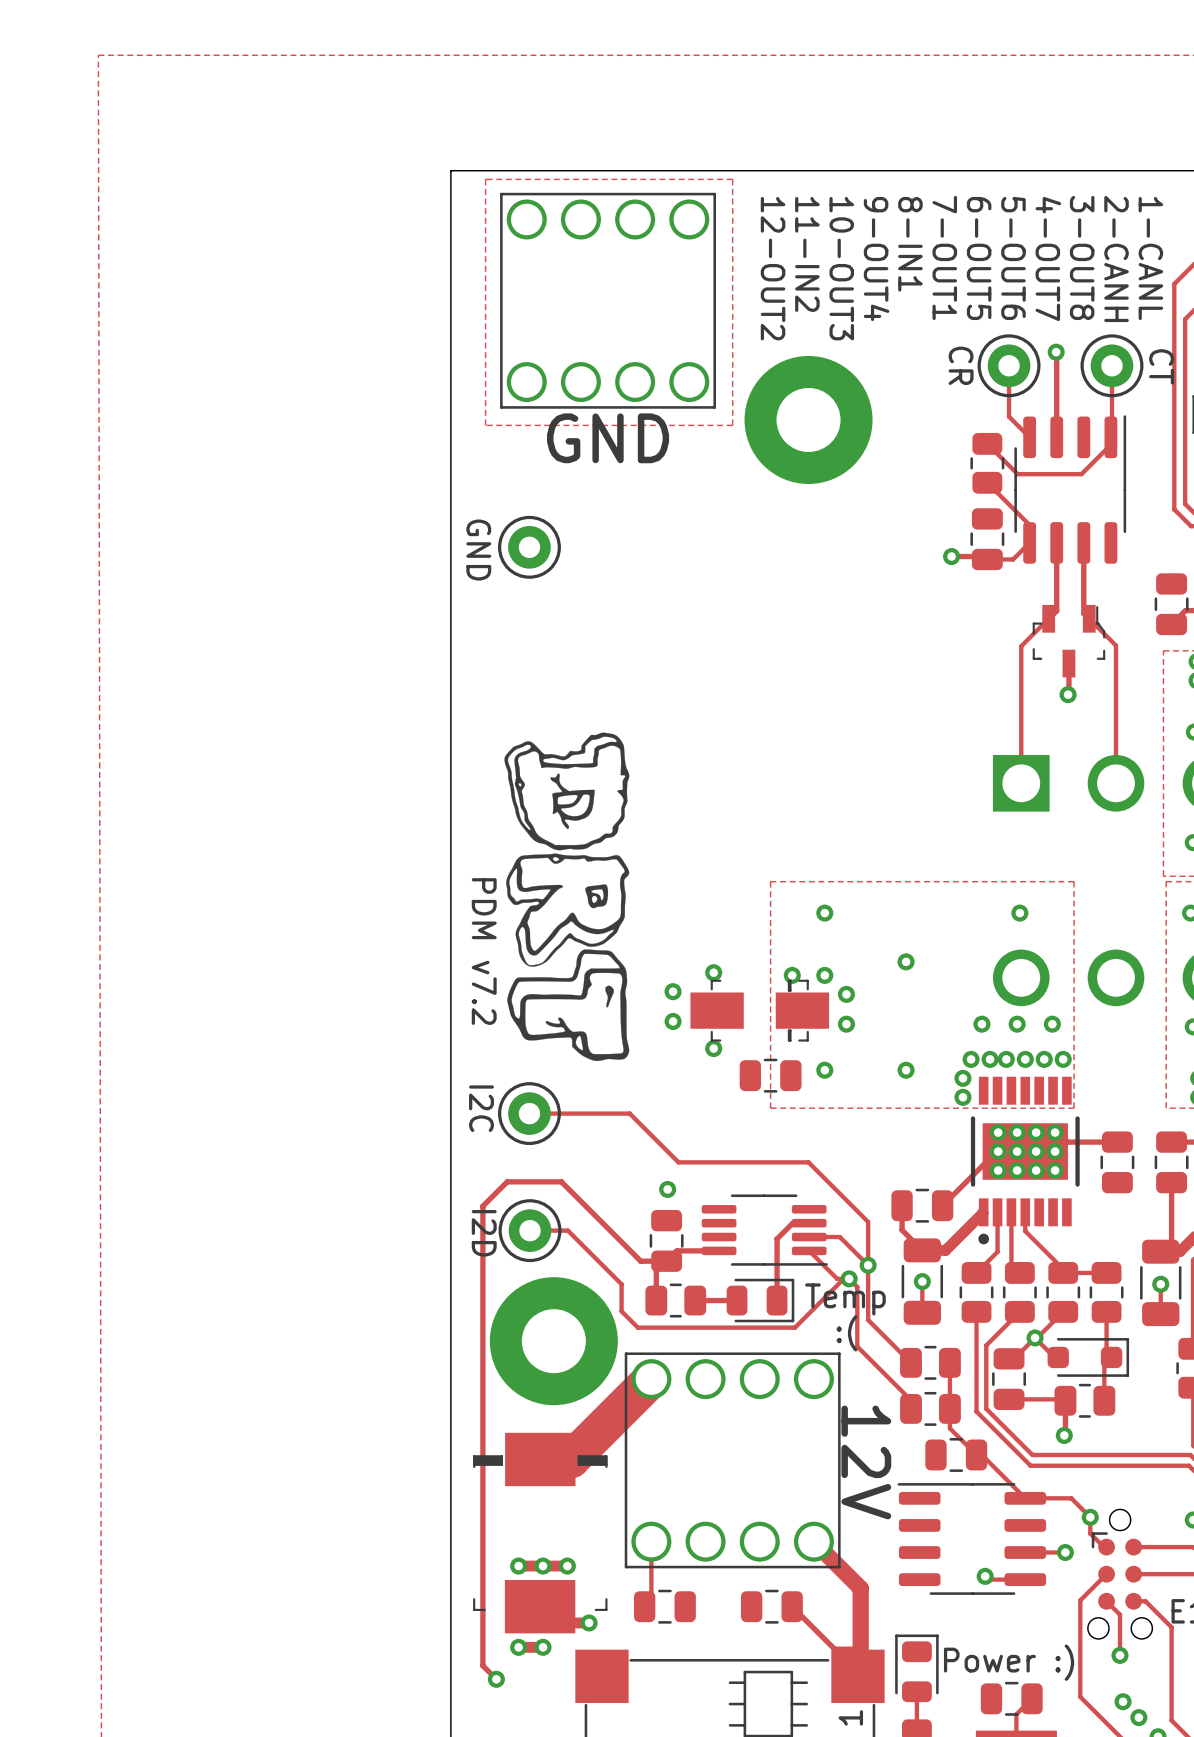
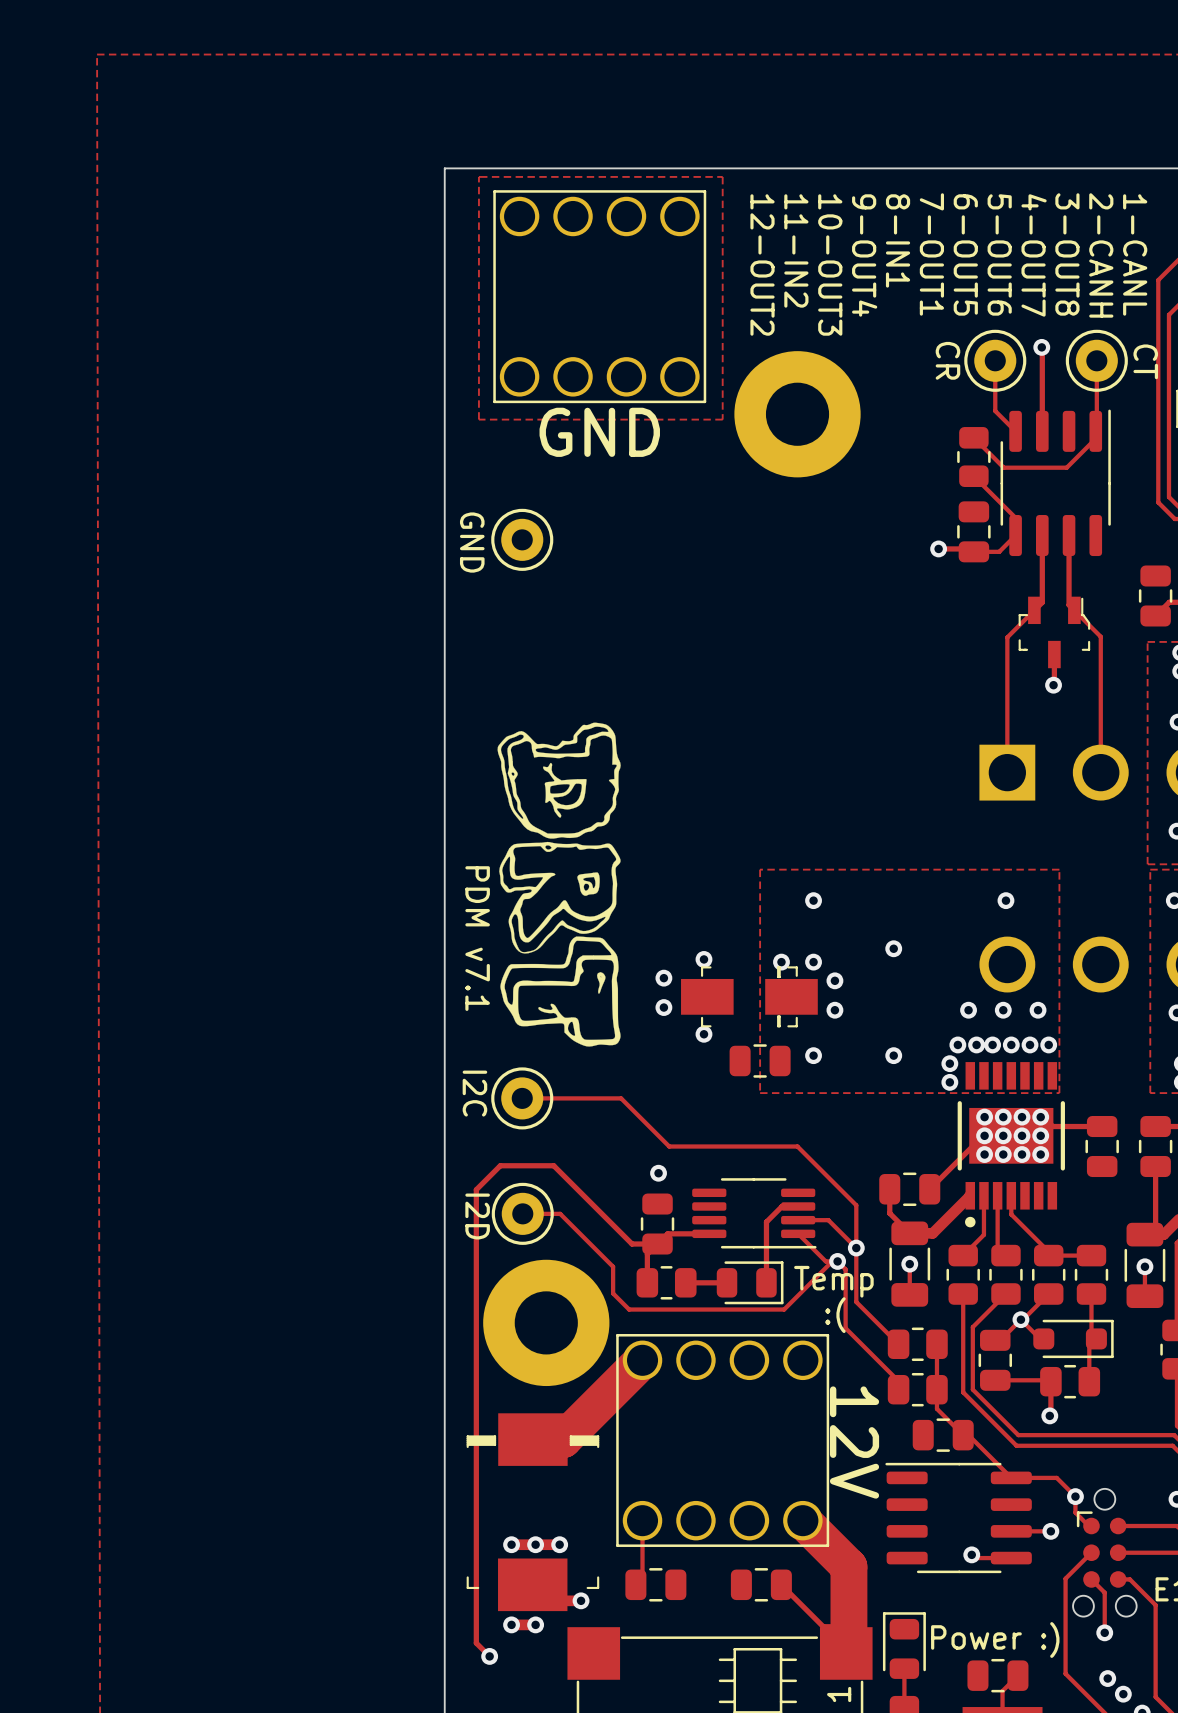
text: PDM v7.2 (484, 951) -> PDM v7.1 (477, 938)
track width: thin (813, 1541) (860, 1588) (860, 1649) -> thick (802, 1520) (848, 1566) (848, 1626)

